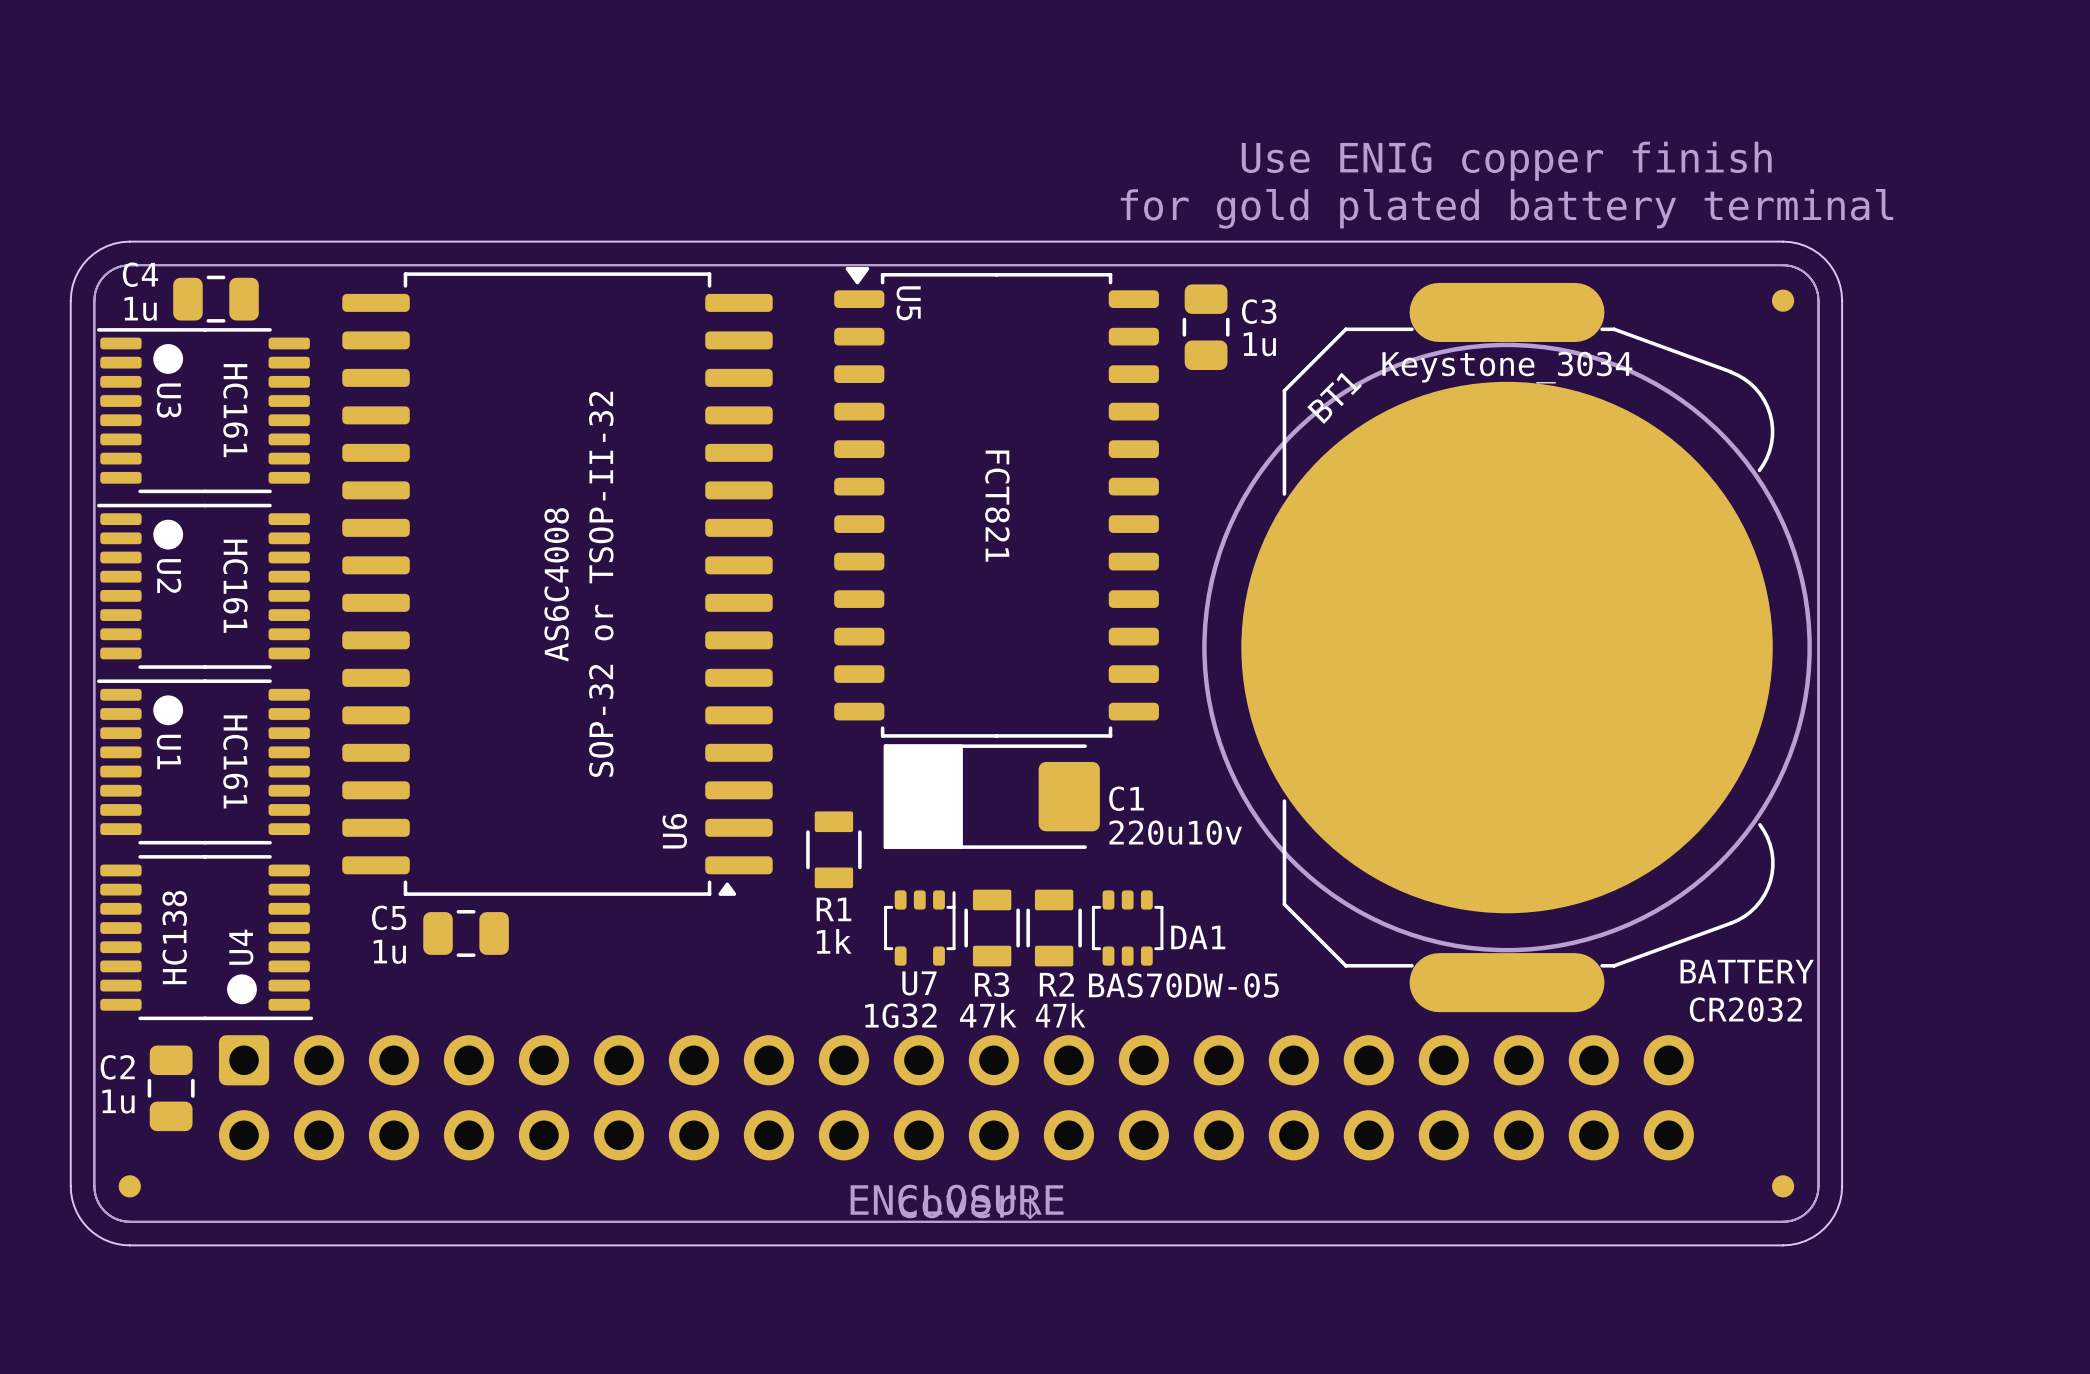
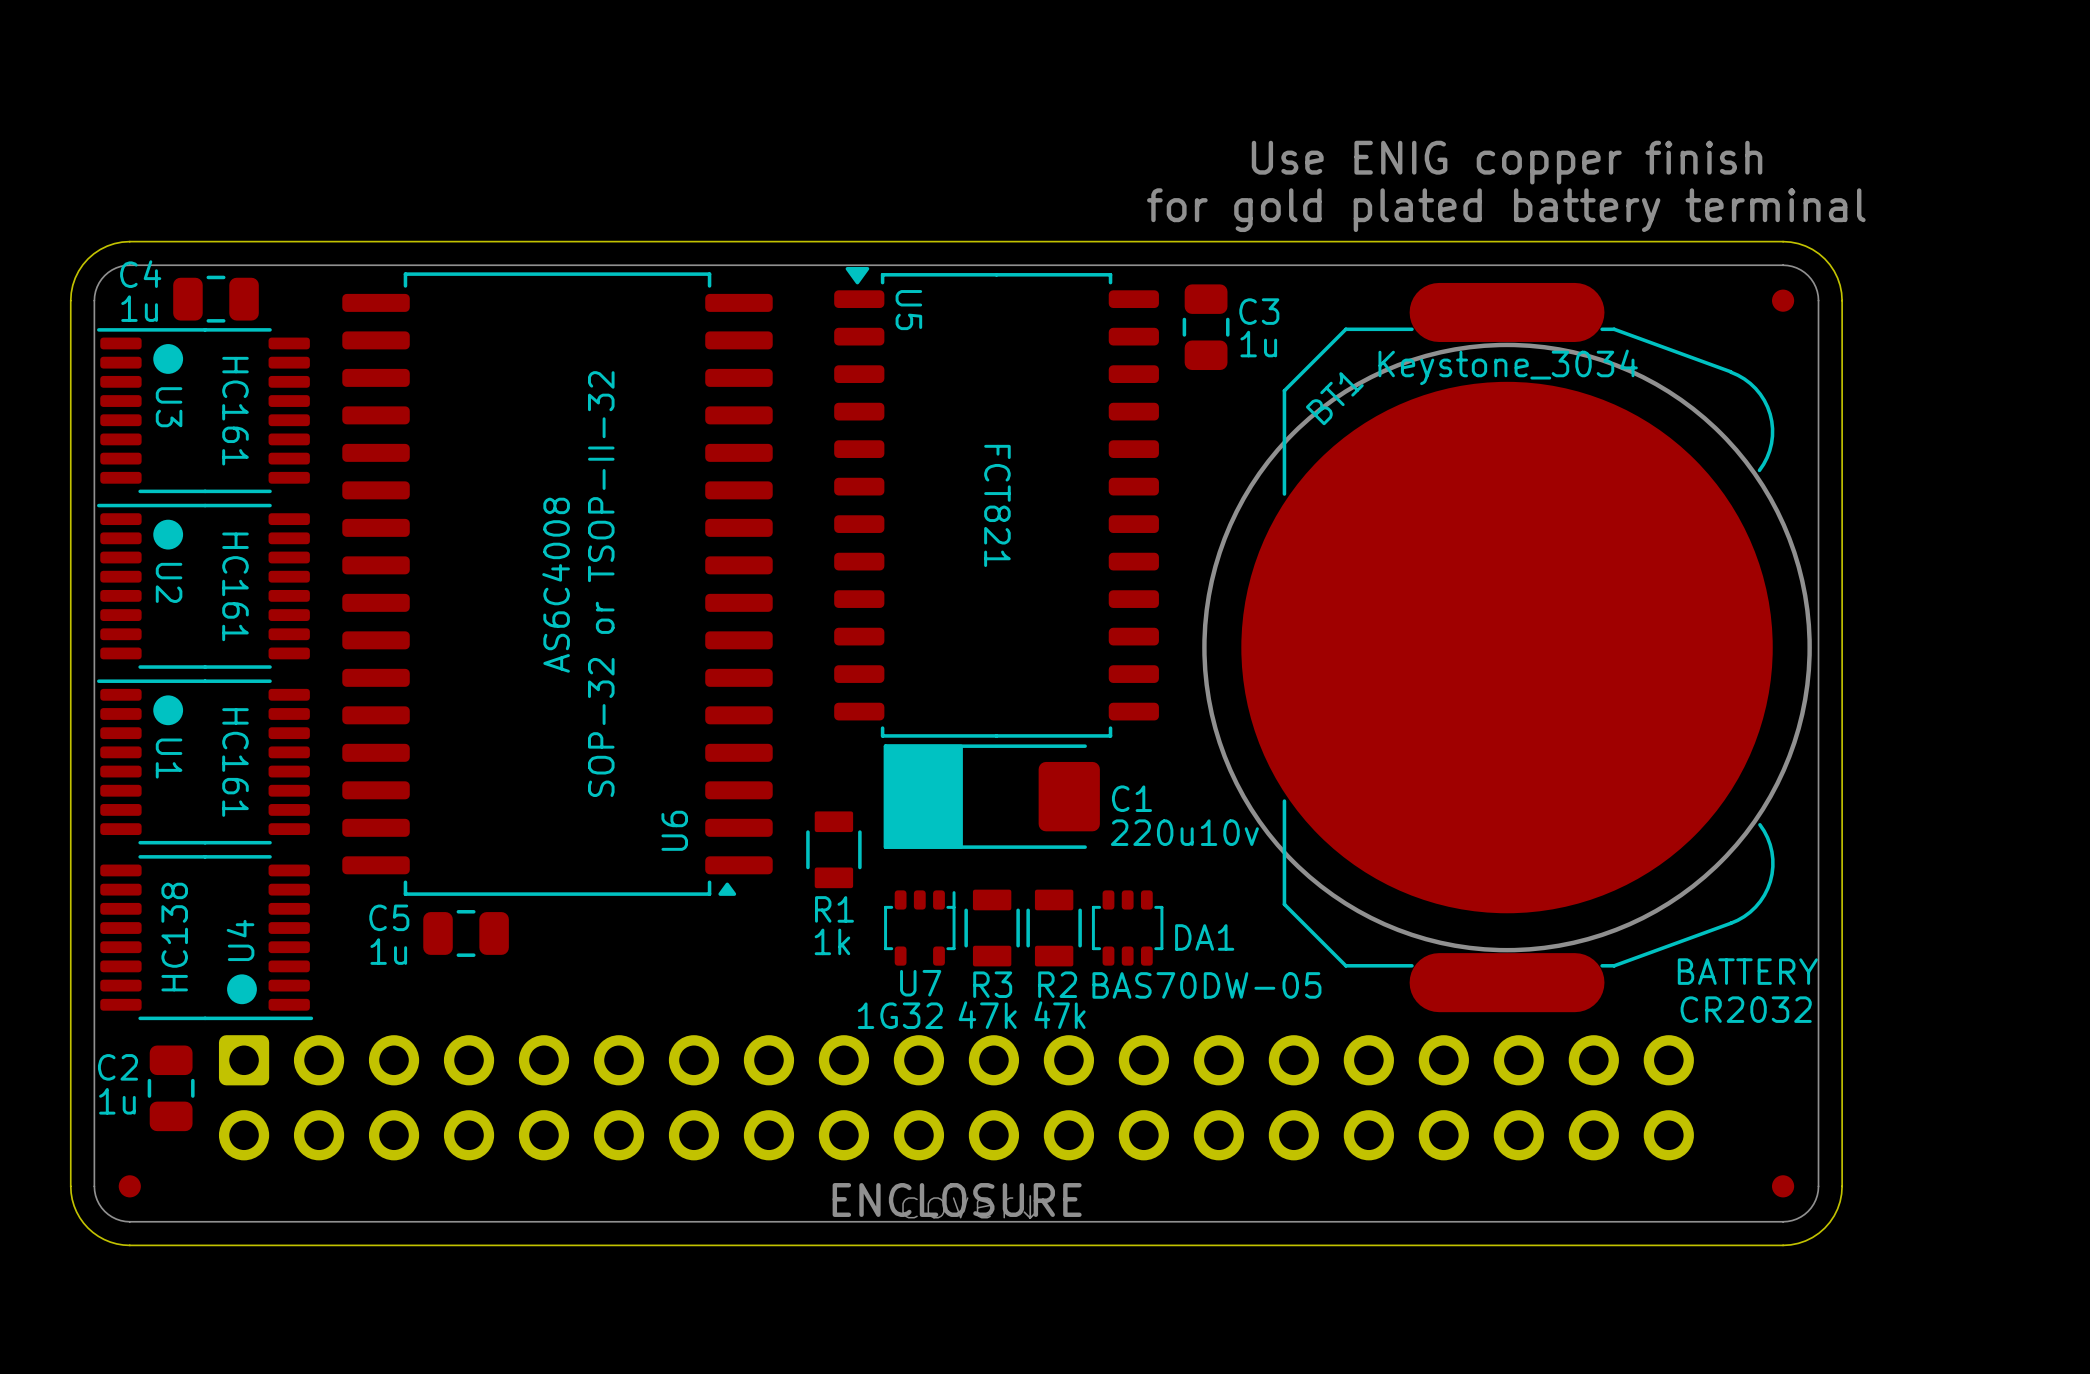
line: (129, 265) (1783, 265) (1800, 269) (1813, 282) (1818, 300) (1818, 1186) (1813, 1204) (1800, 1217) (1783, 1221) (129, 1221) (112, 1217) (99, 1204) (94, 1186) (94, 300) (97, 287) (104, 275) (116, 267) (129, 265) -> none

